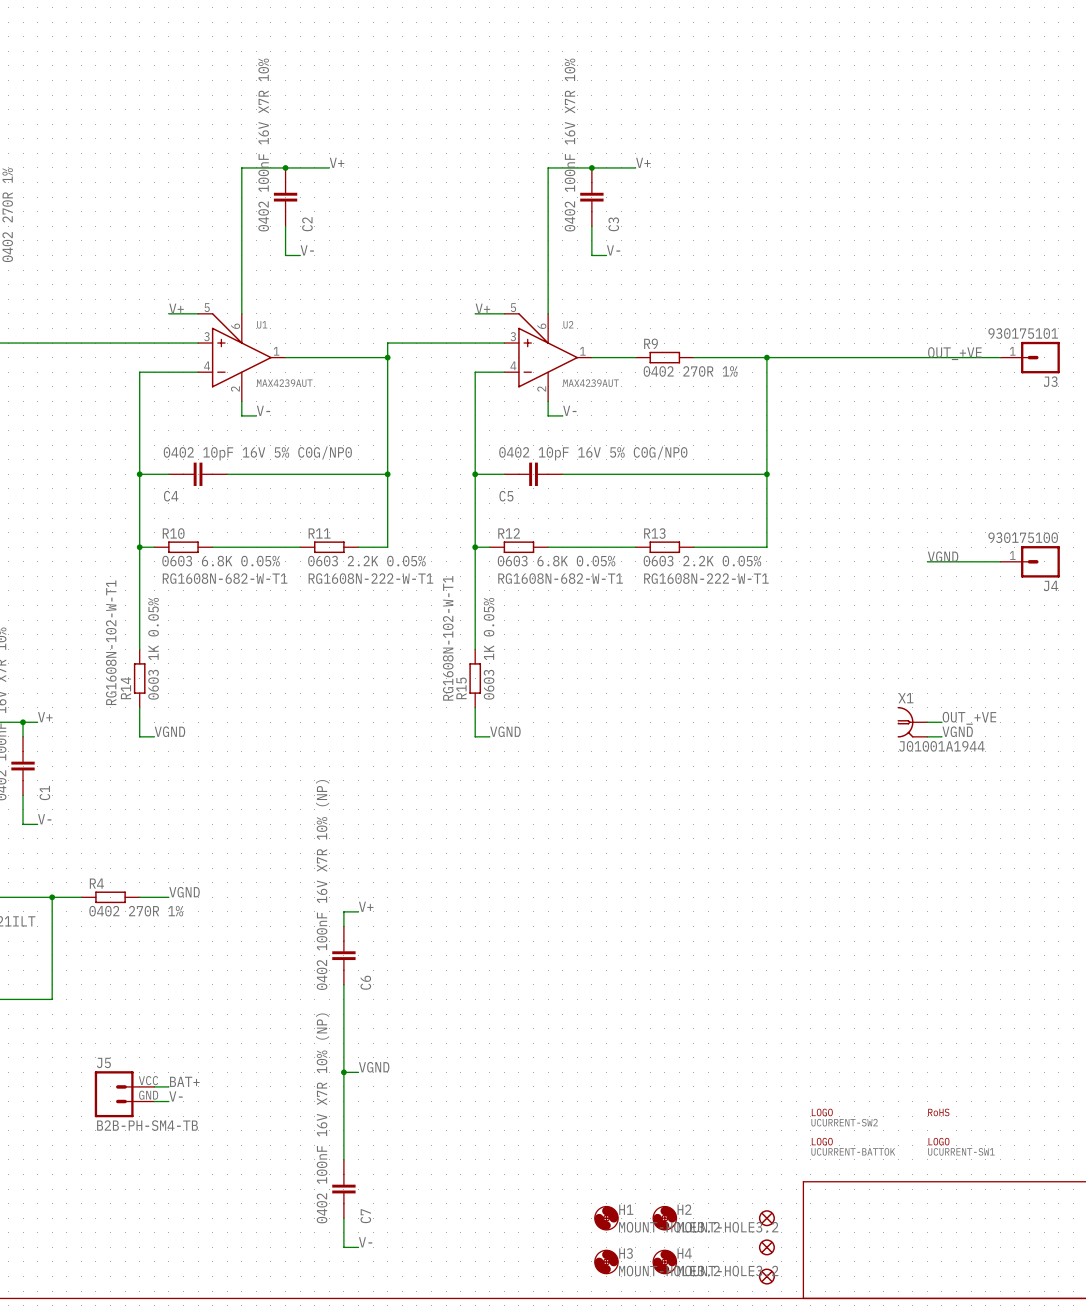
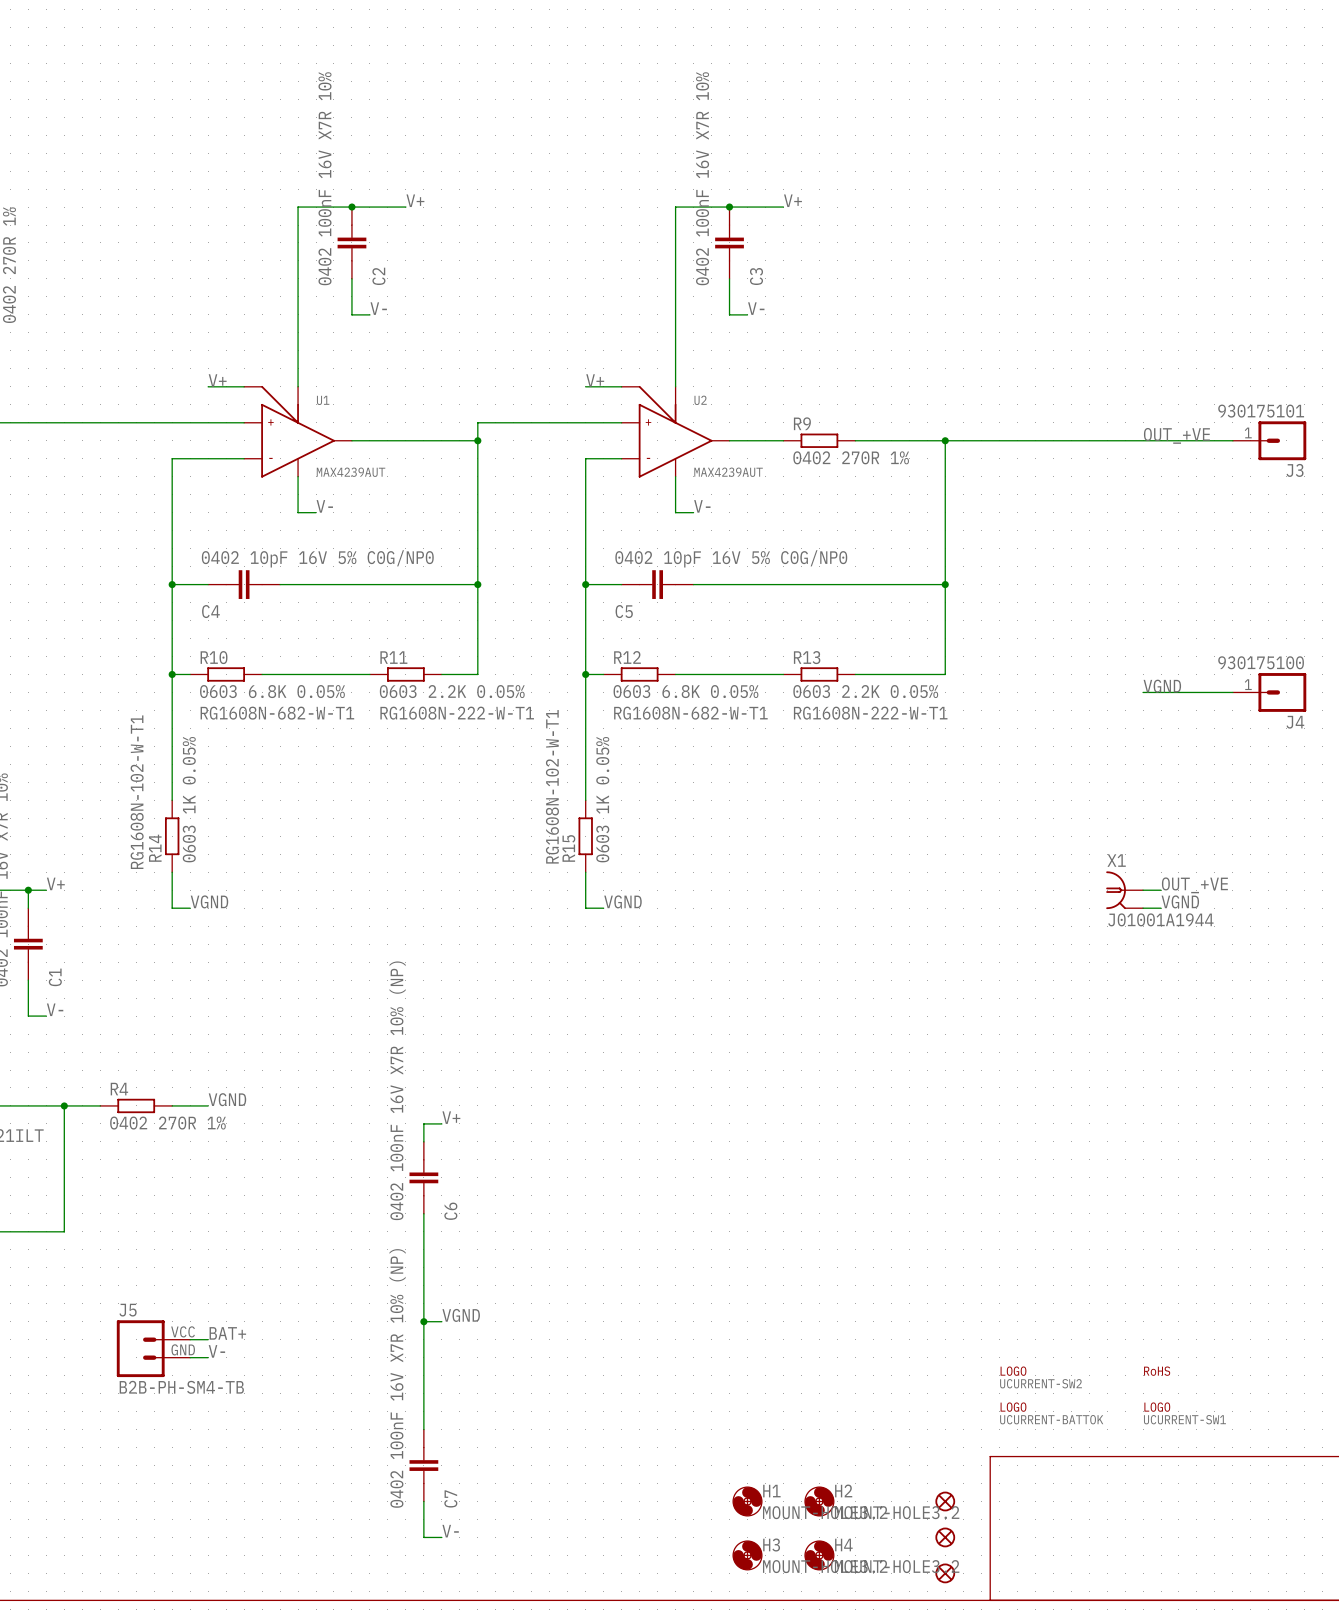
U1 symbol: [198, 313, 286, 402] -> [244, 385, 352, 478]
U2 symbol: [504, 313, 592, 402] -> [621, 385, 730, 478]

